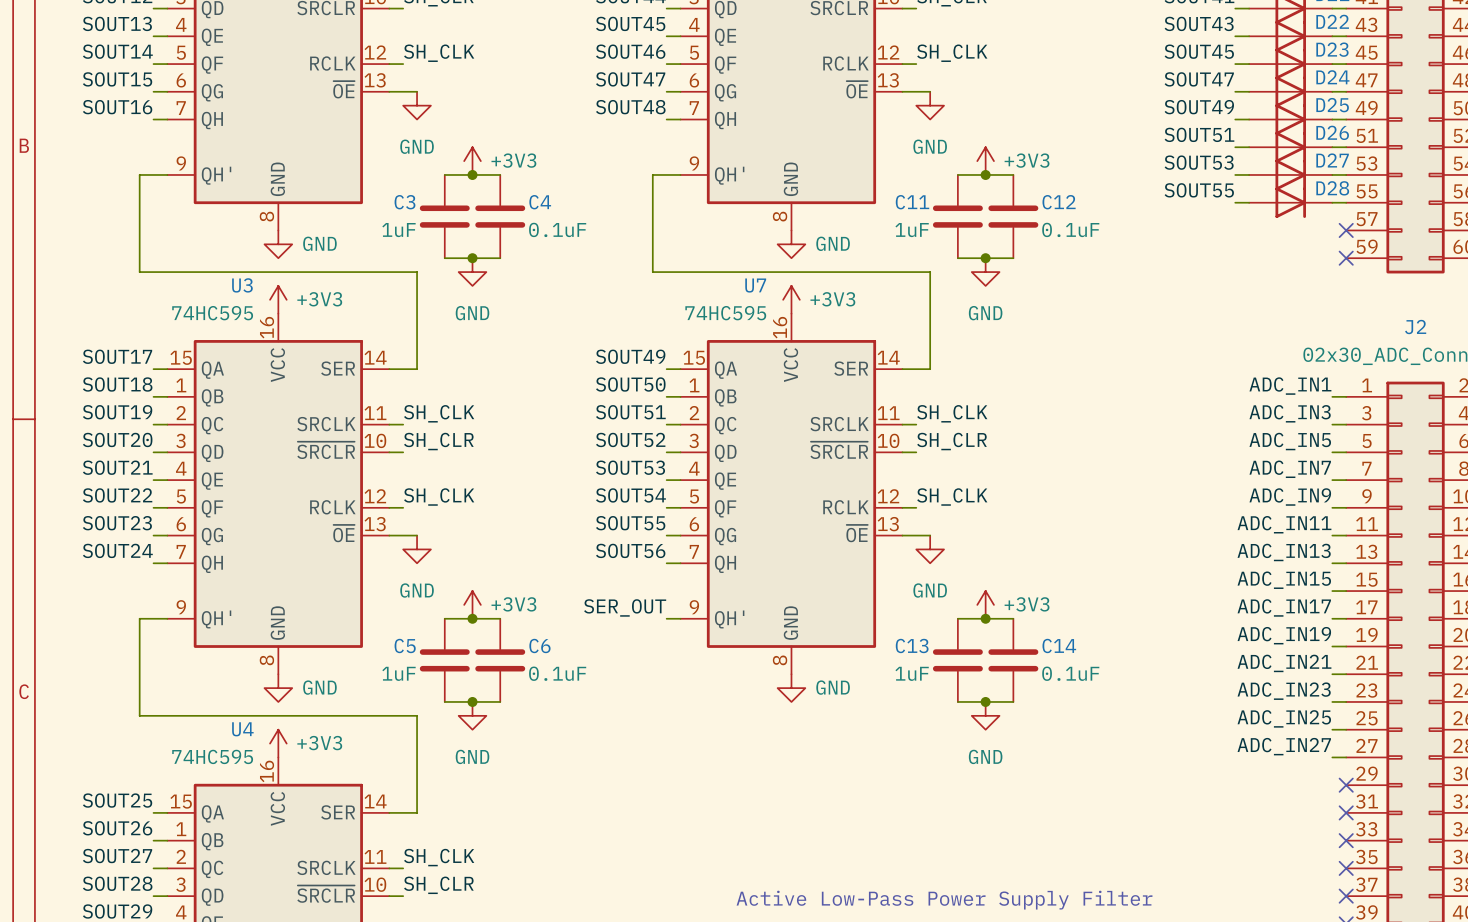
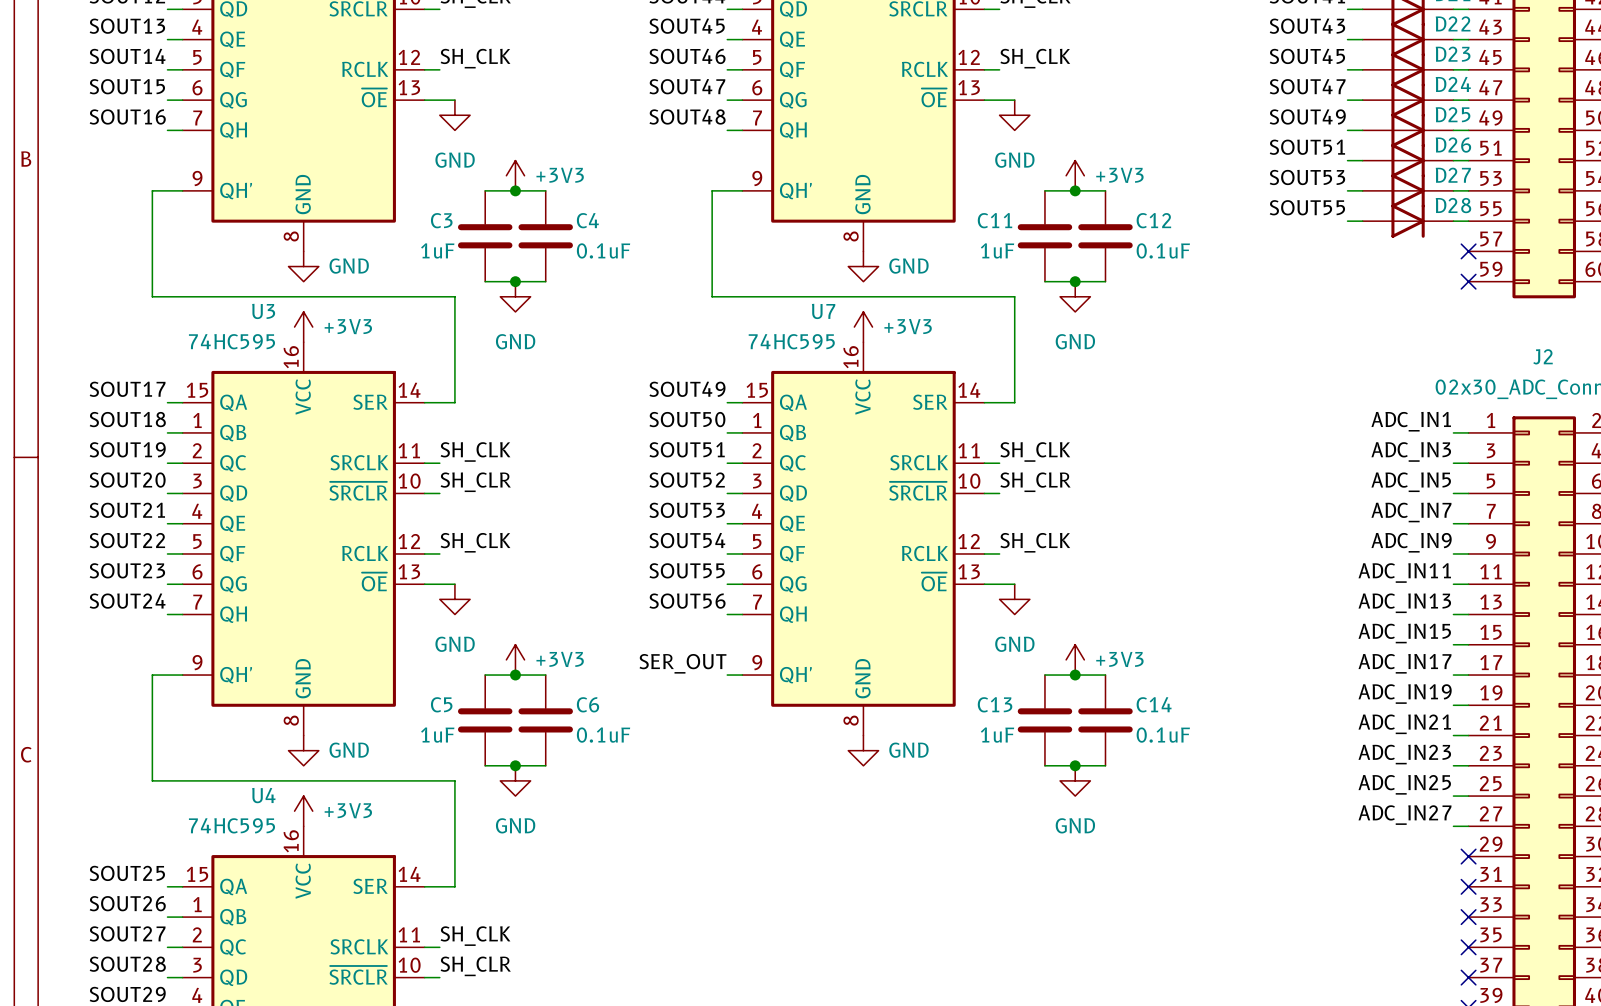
text: Active Low-Pass Power Supply Filter (944, 900) -> none

